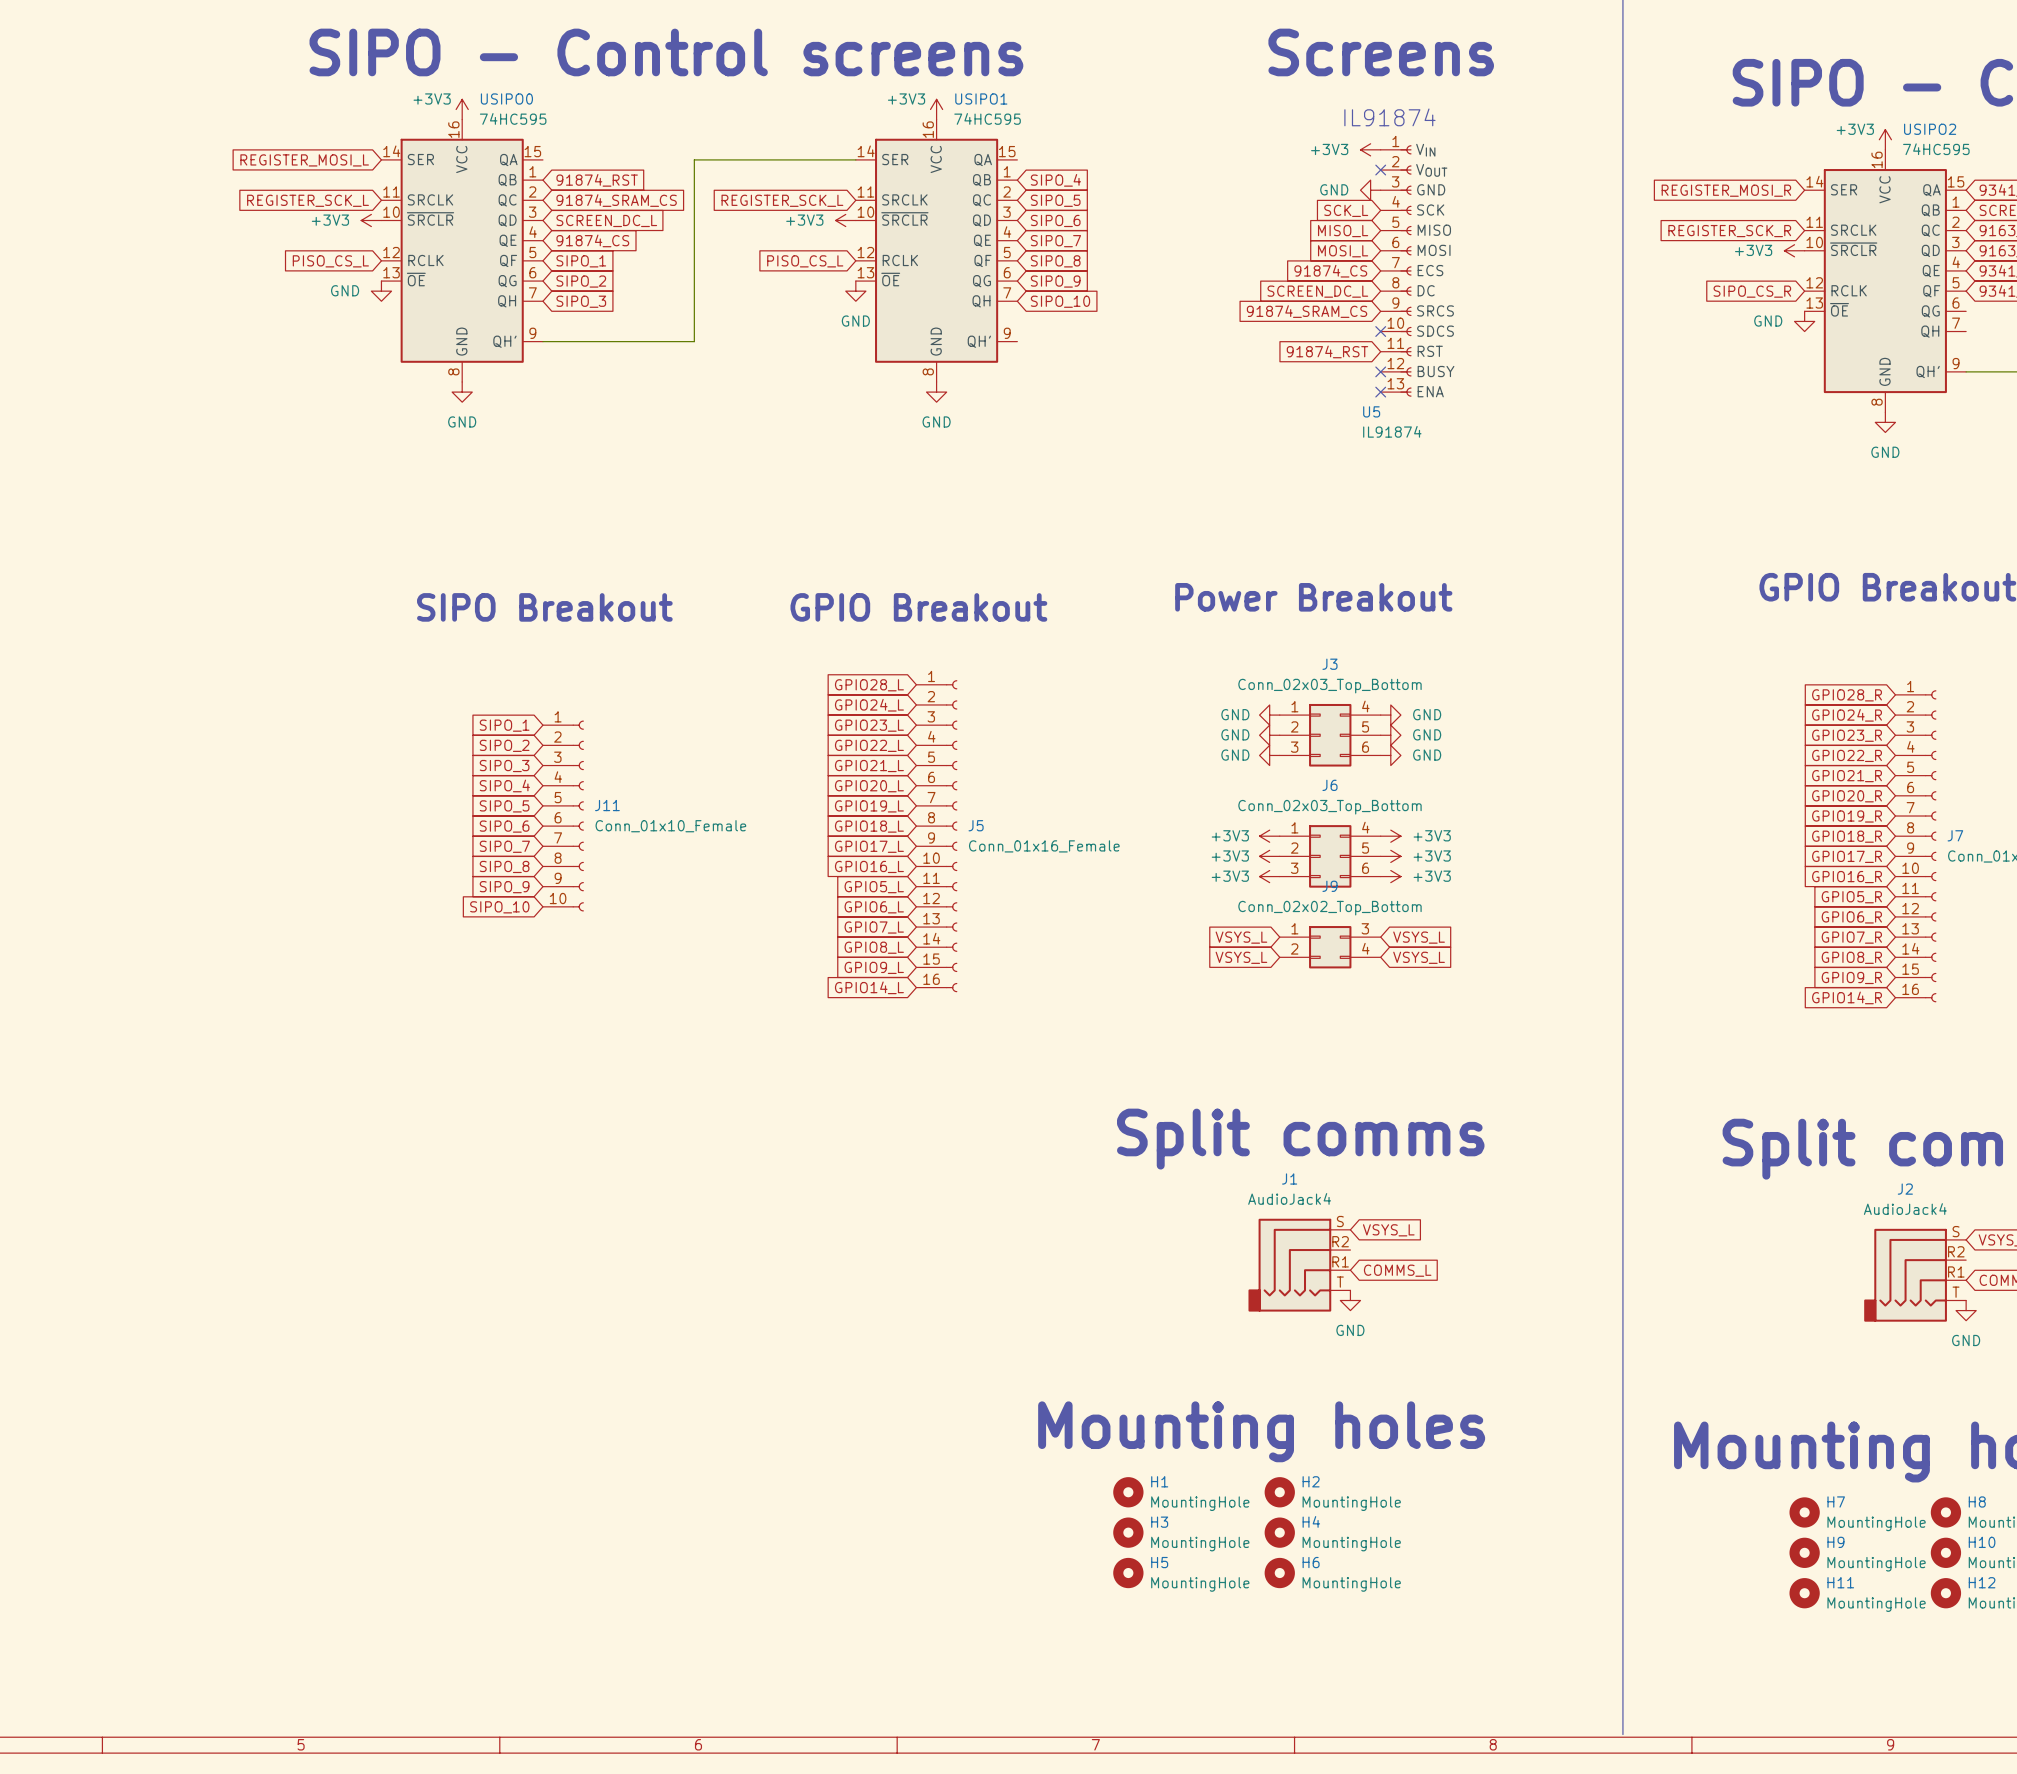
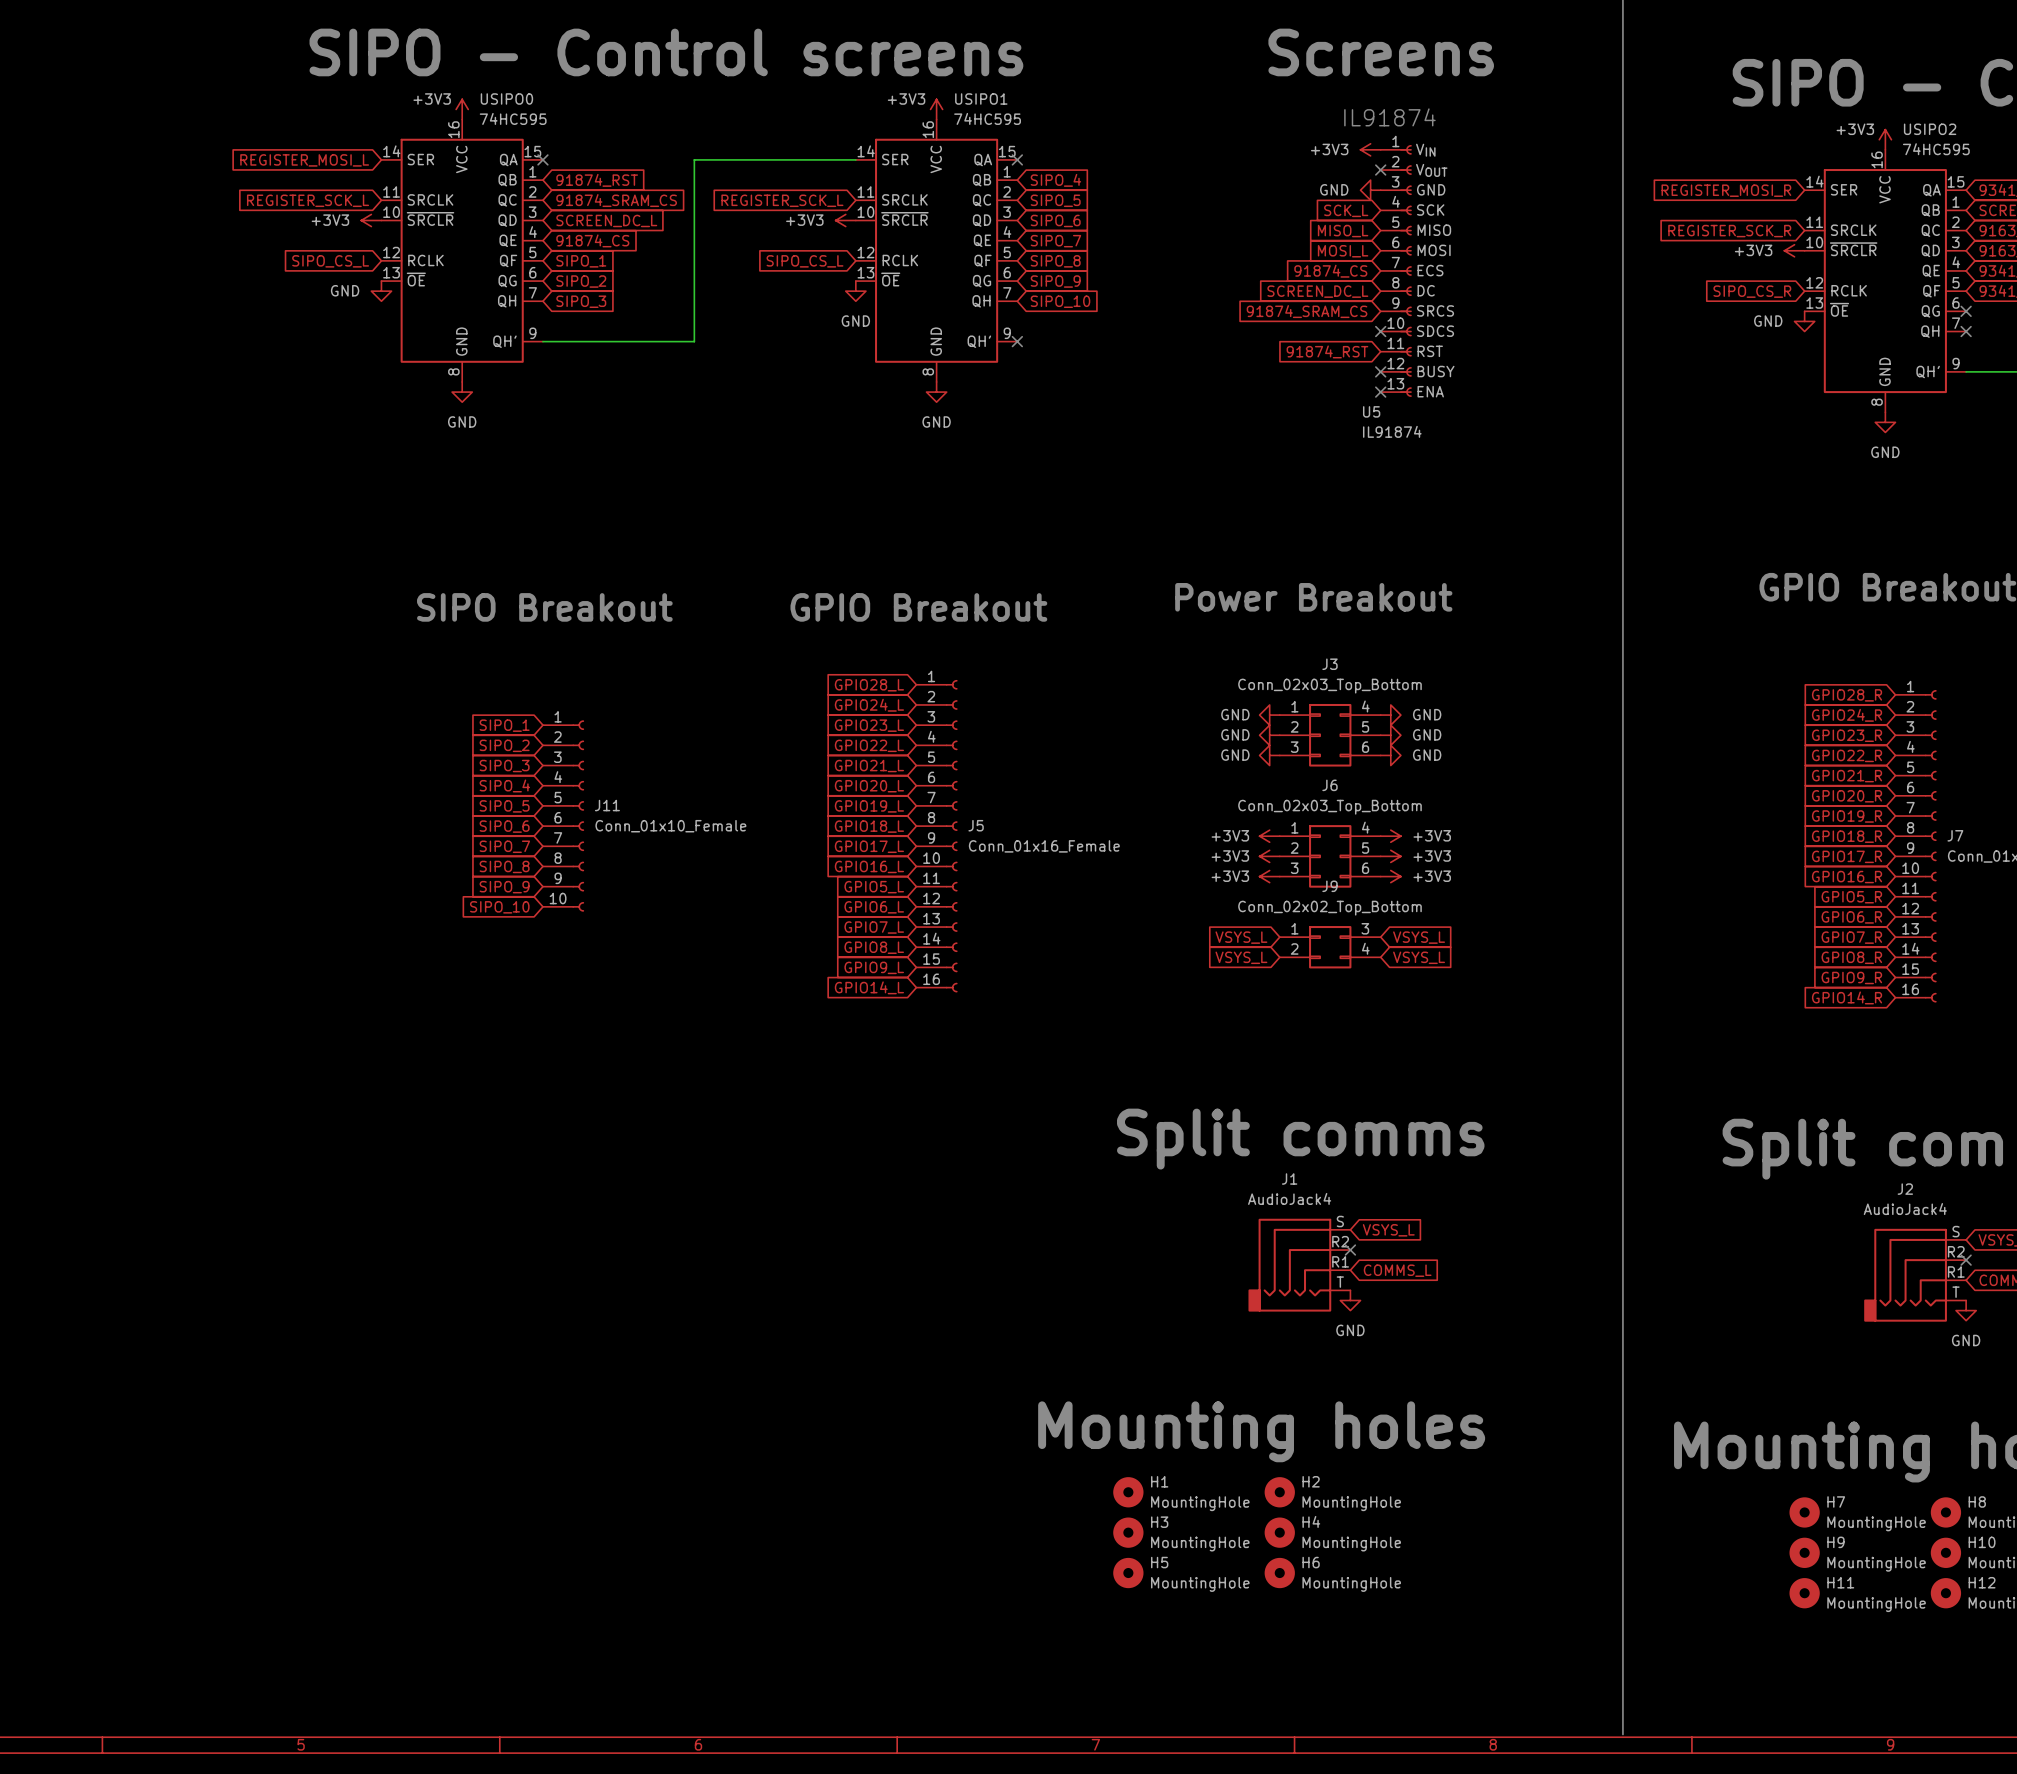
no-connect mark: none -> (542, 159)
no-connect mark: none -> (1017, 159)
global label: PISO_CS_L (330, 261) -> SIPO_CS_L (330, 261)
global label: PISO_CS_L (805, 261) -> SIPO_CS_L (805, 261)
no-connect mark: none -> (1966, 311)
no-connect mark: none -> (1966, 331)
no-connect mark: none -> (1017, 341)
no-connect mark: none -> (1350, 1250)
no-connect mark: none -> (1966, 1260)

